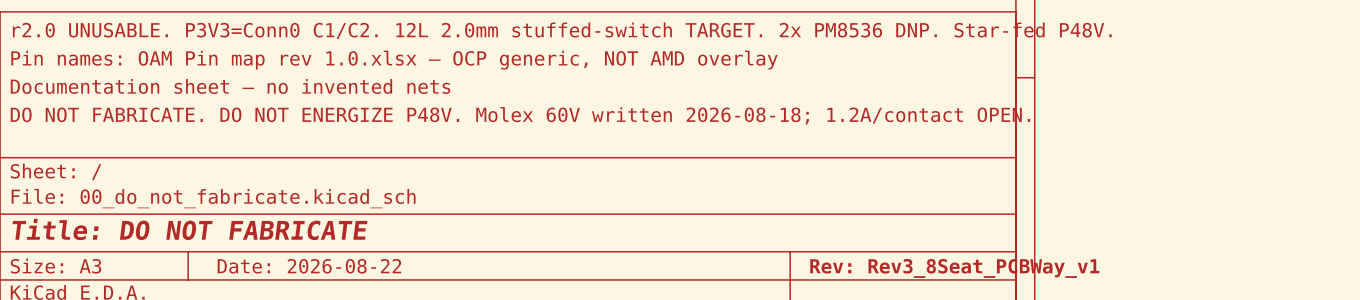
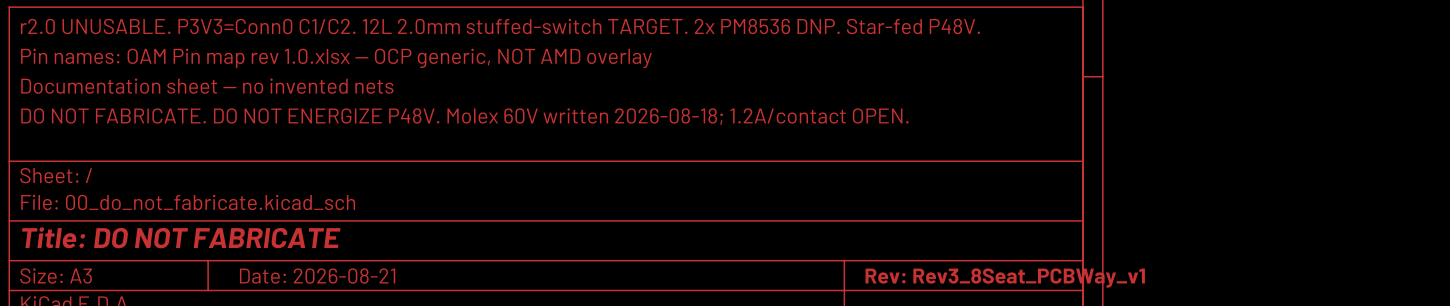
title block: Date: 2026-08-22 (309, 266) -> Date: 2026-08-21 (317, 276)

